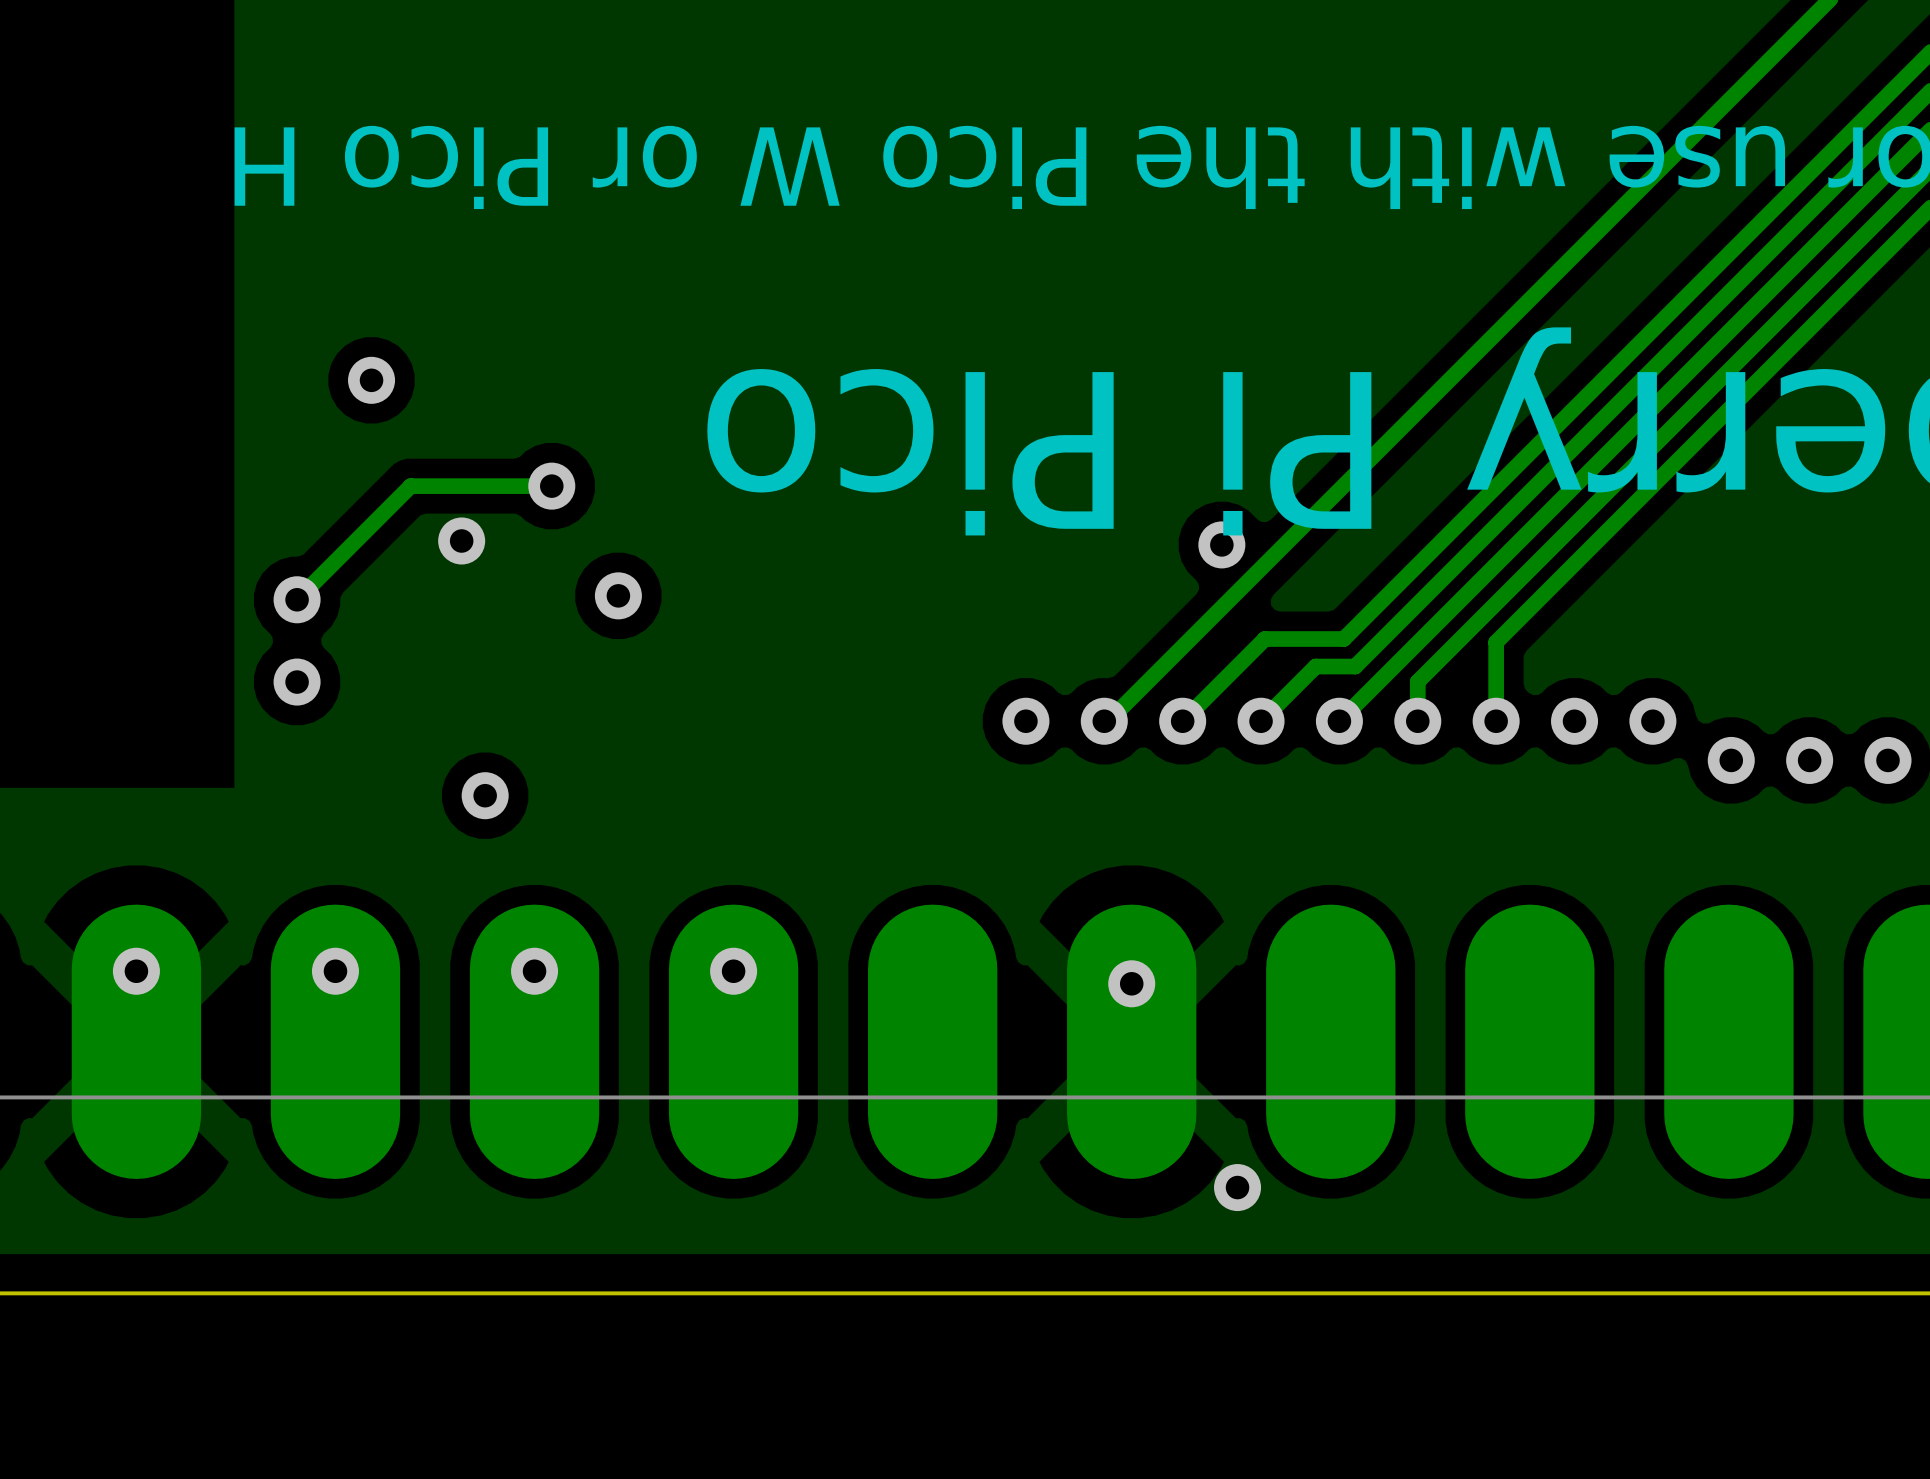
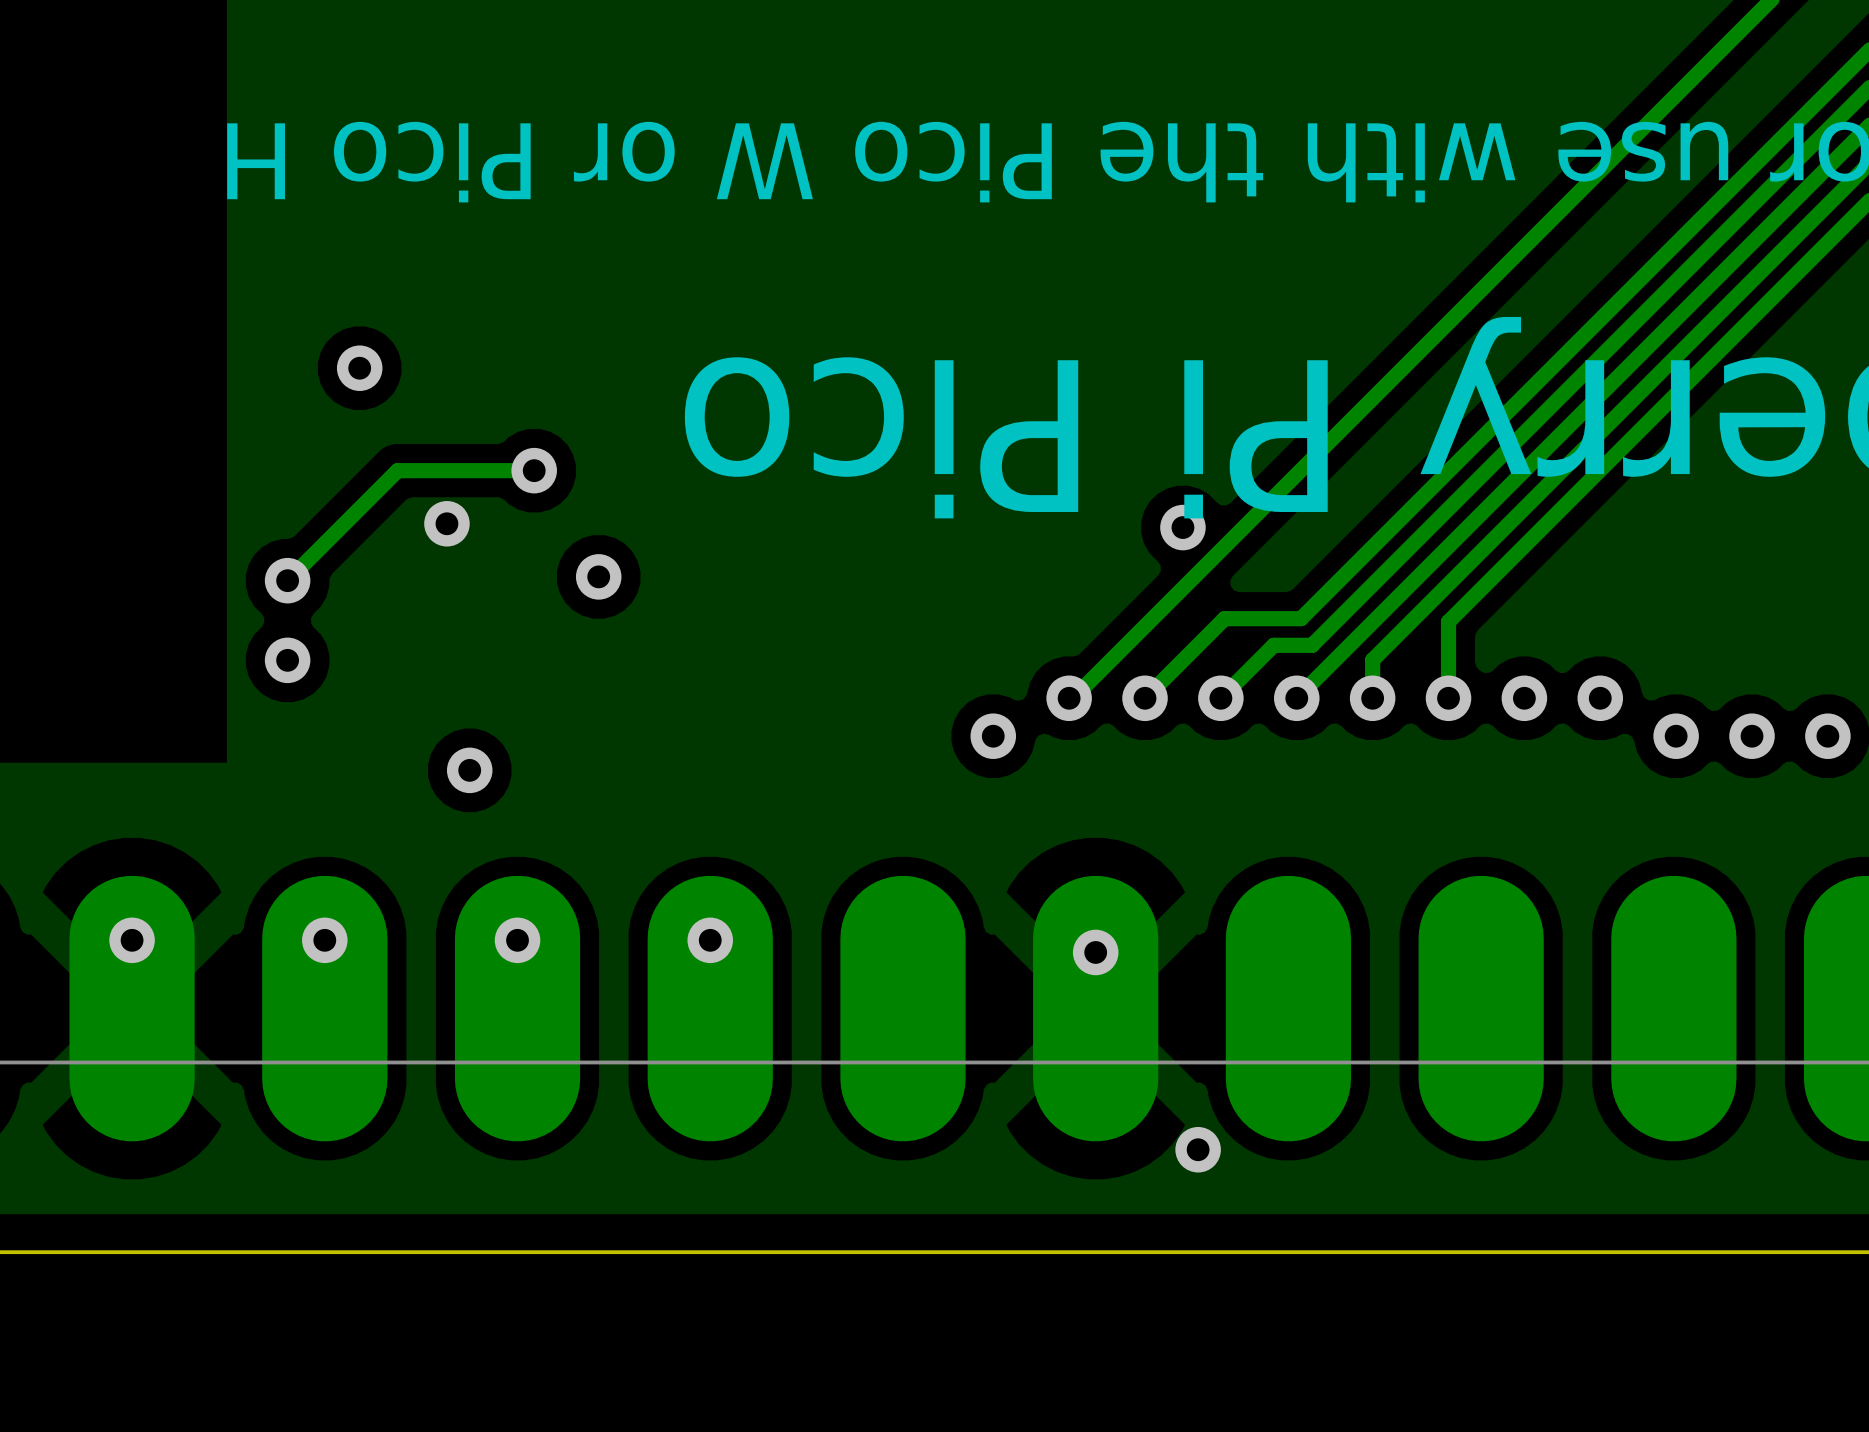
via position: (1025, 721) -> (993, 736)

